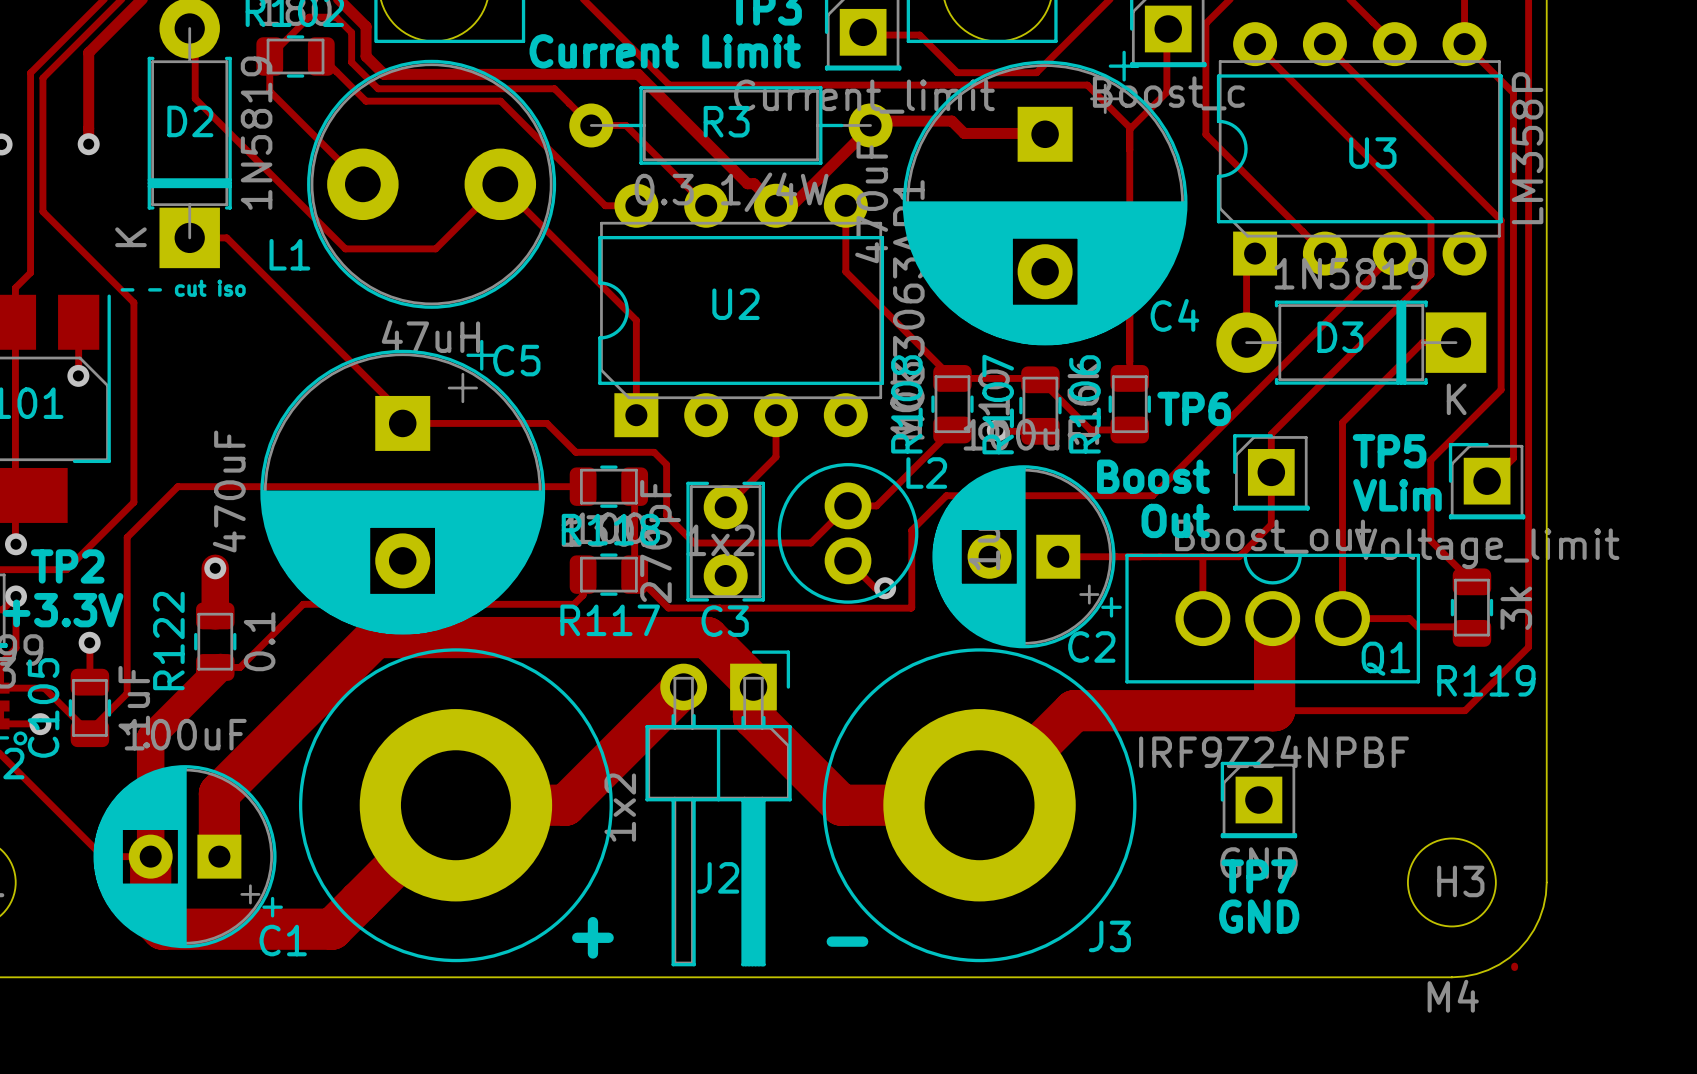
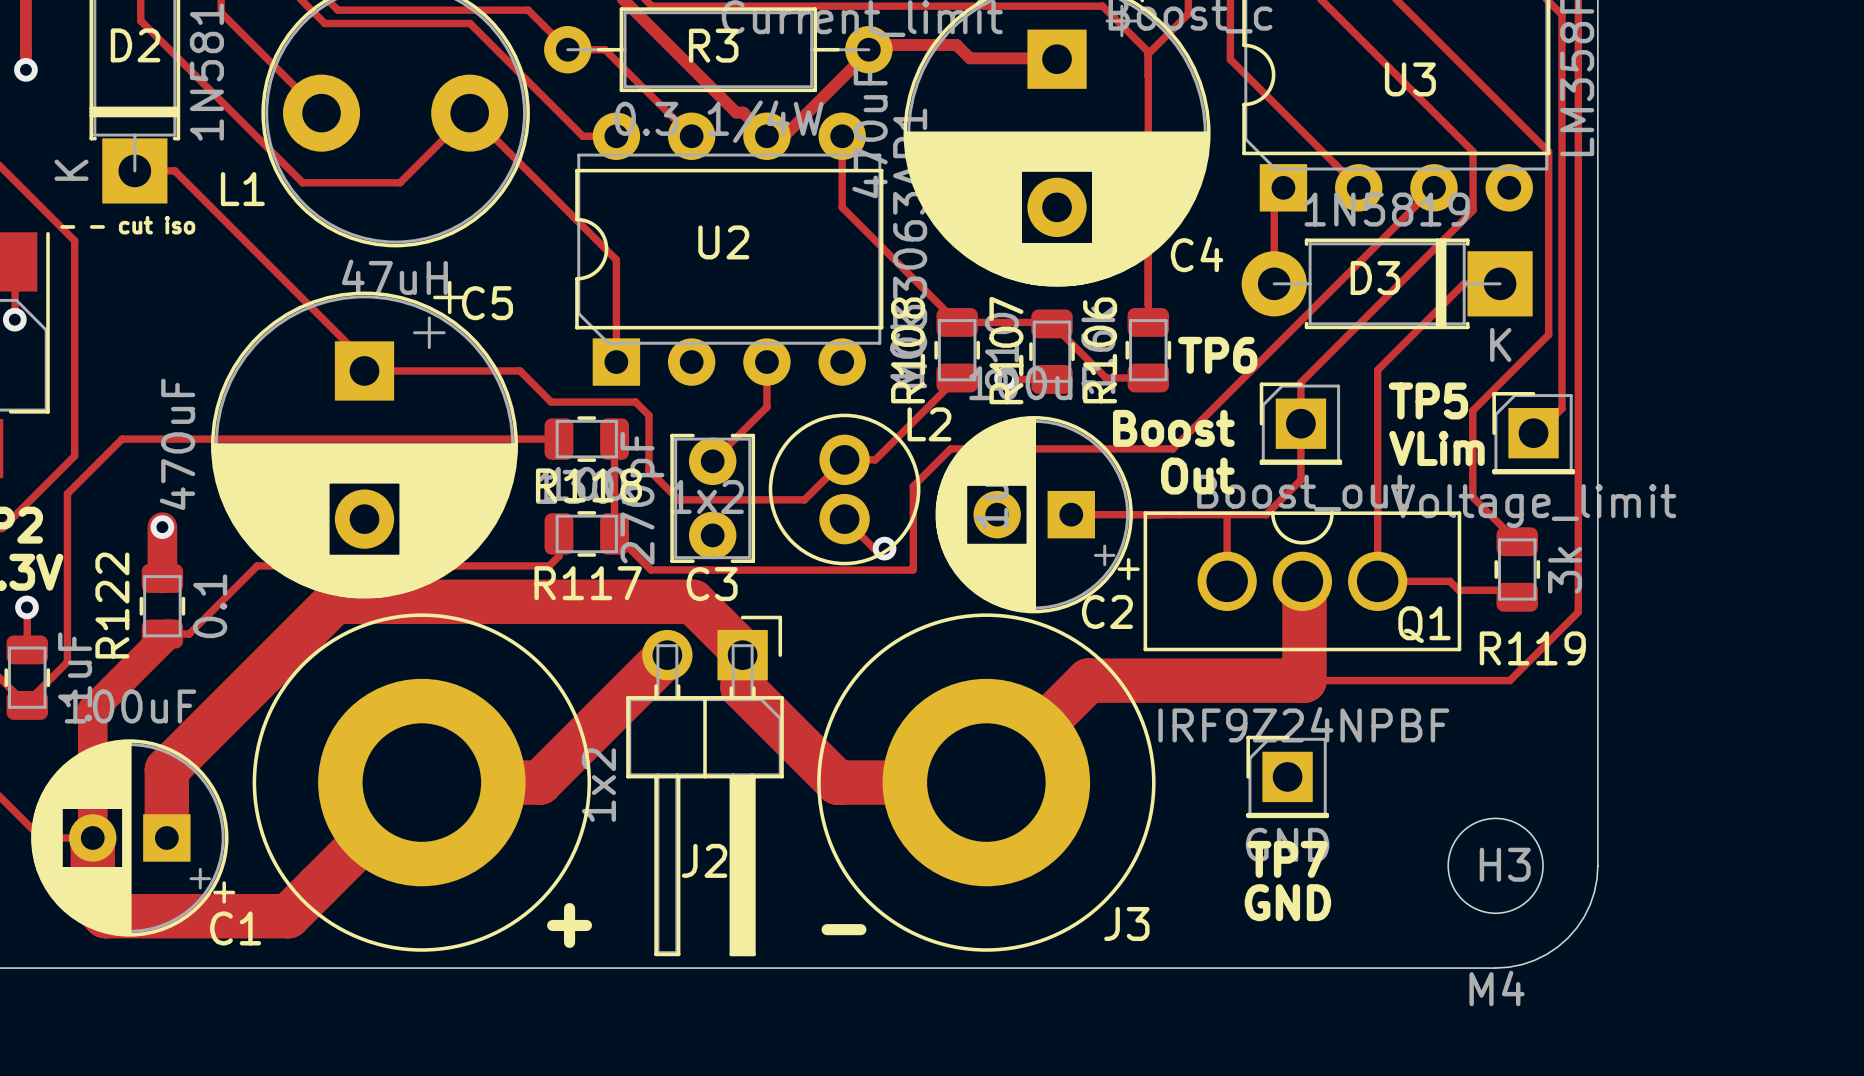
track: (1514, 966) (1514, 967) -> none

